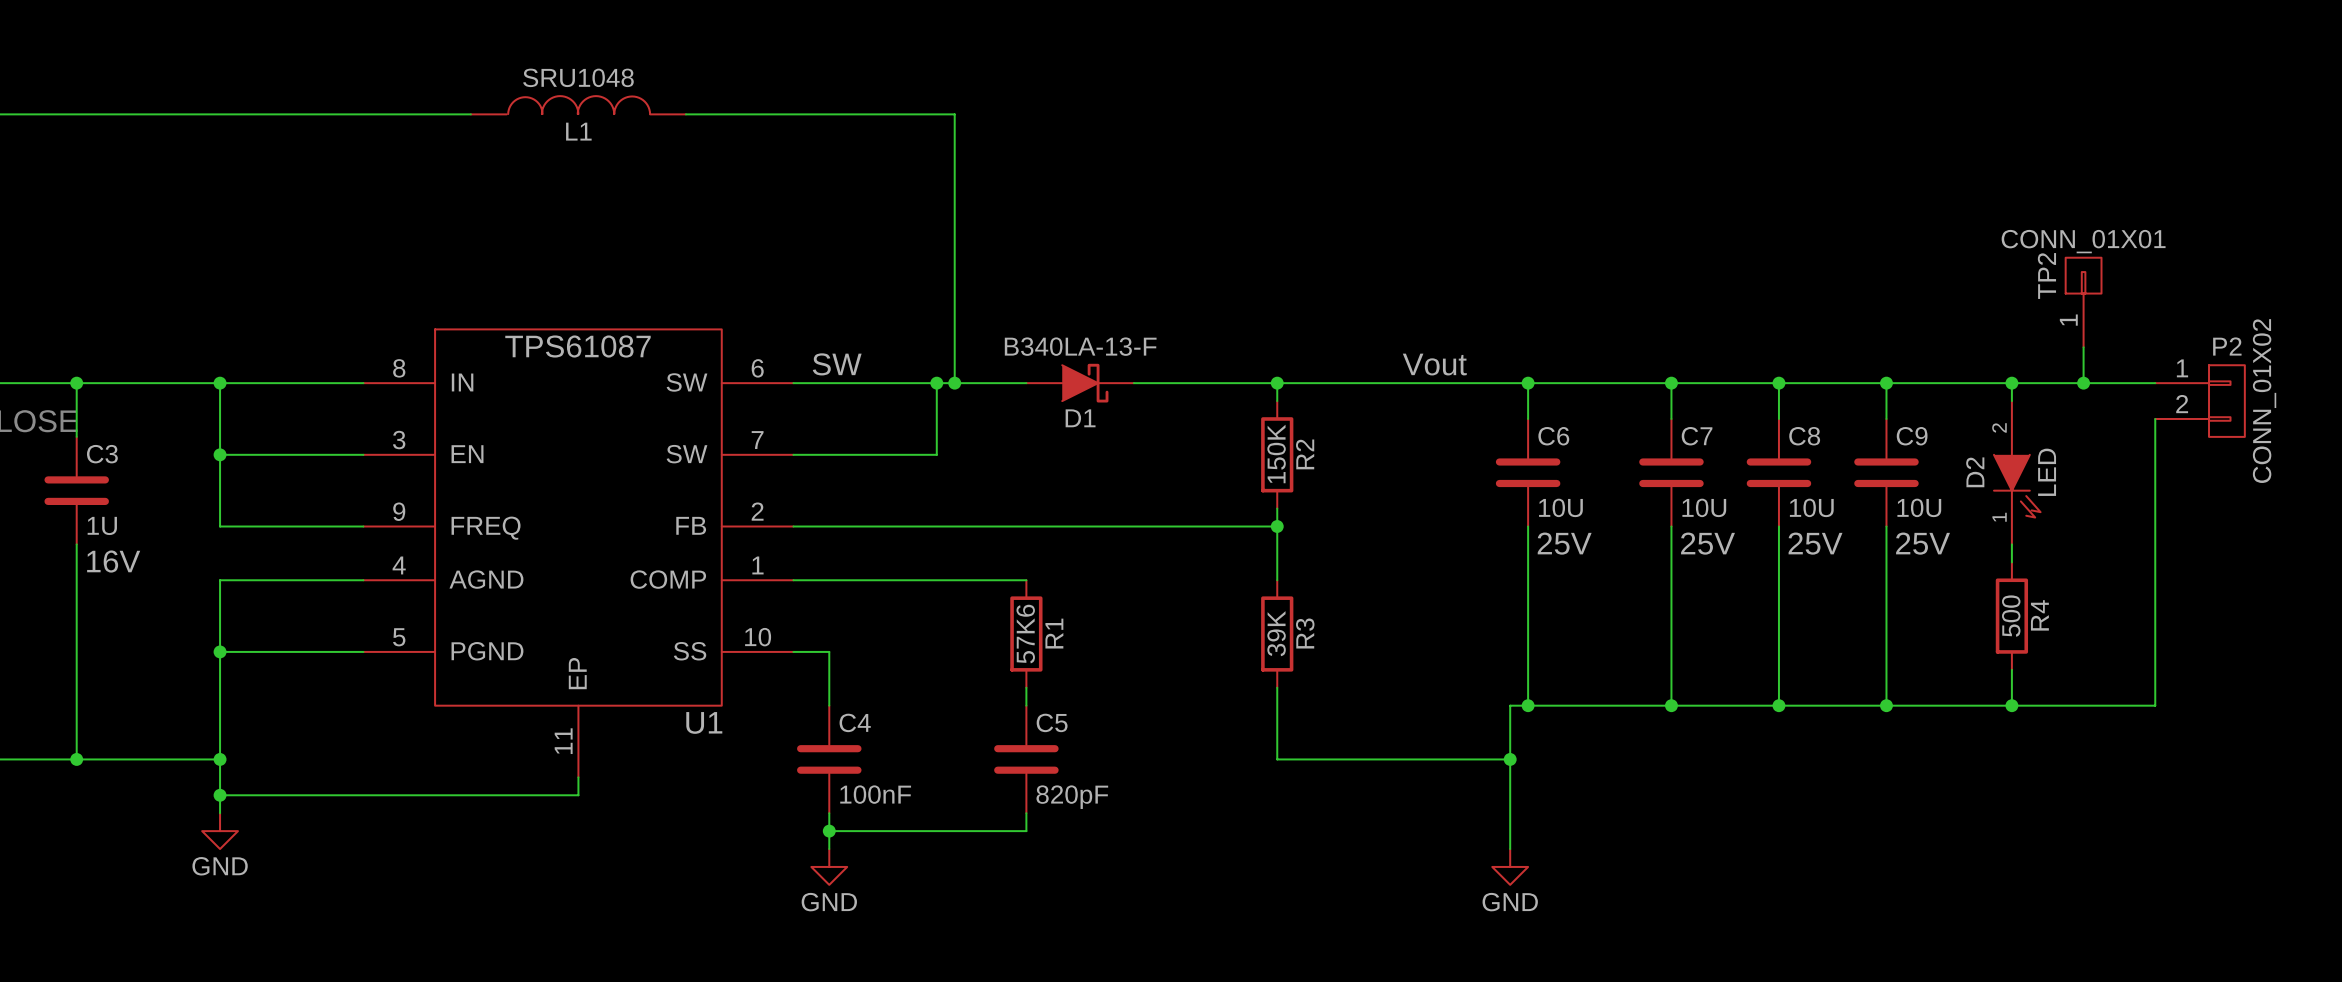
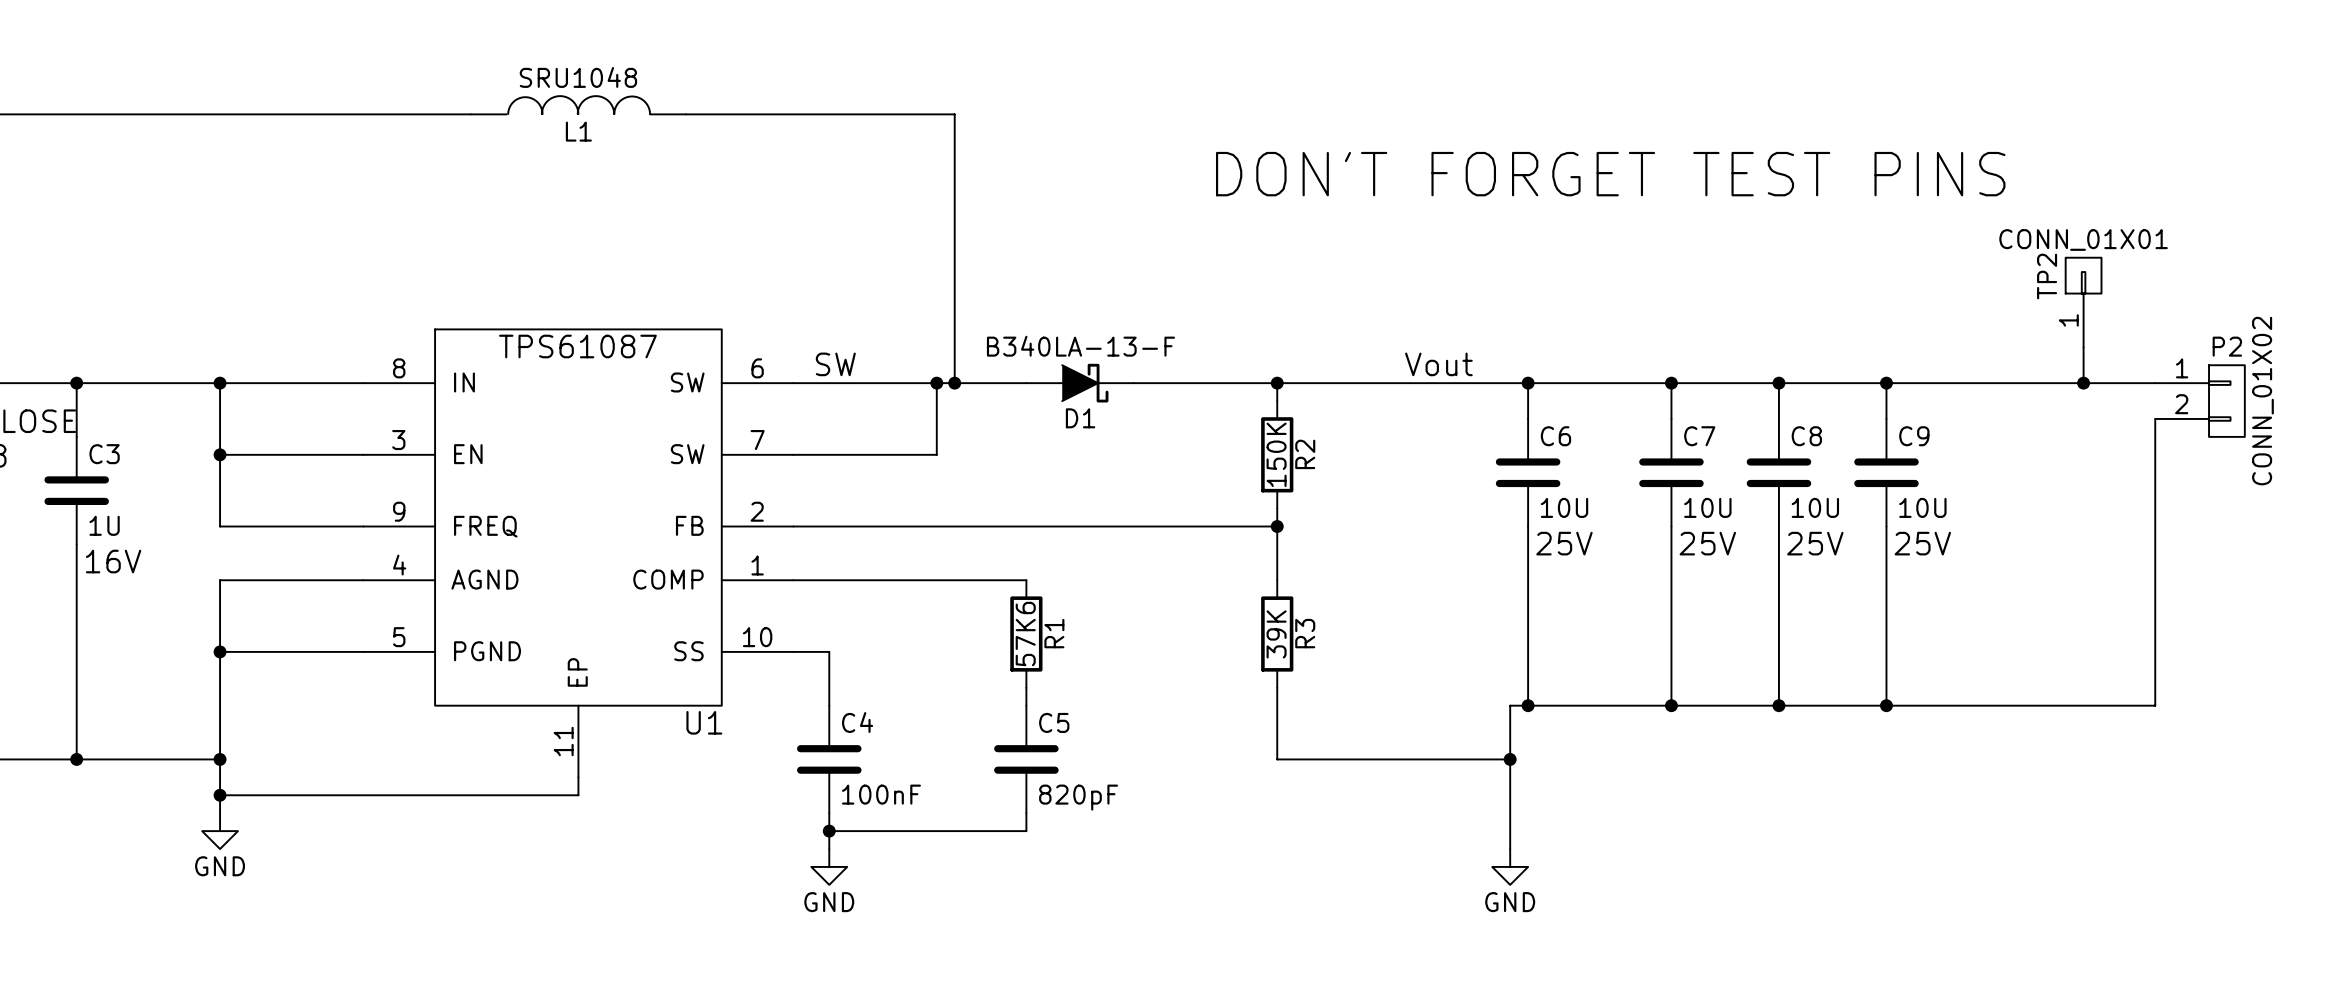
text: none -> DON'T FORGET TEST PINS (1610, 174)
wire: (2011, 383) (2011, 401) -> none
junction: (2011, 383) -> none
D2: LED (2017, 472) -> none
wire: (2011, 544) (2011, 562) -> none
R4: 500 (2011, 616) -> none
wire: (2011, 669) (2011, 705) -> none
junction: (2011, 705) -> none

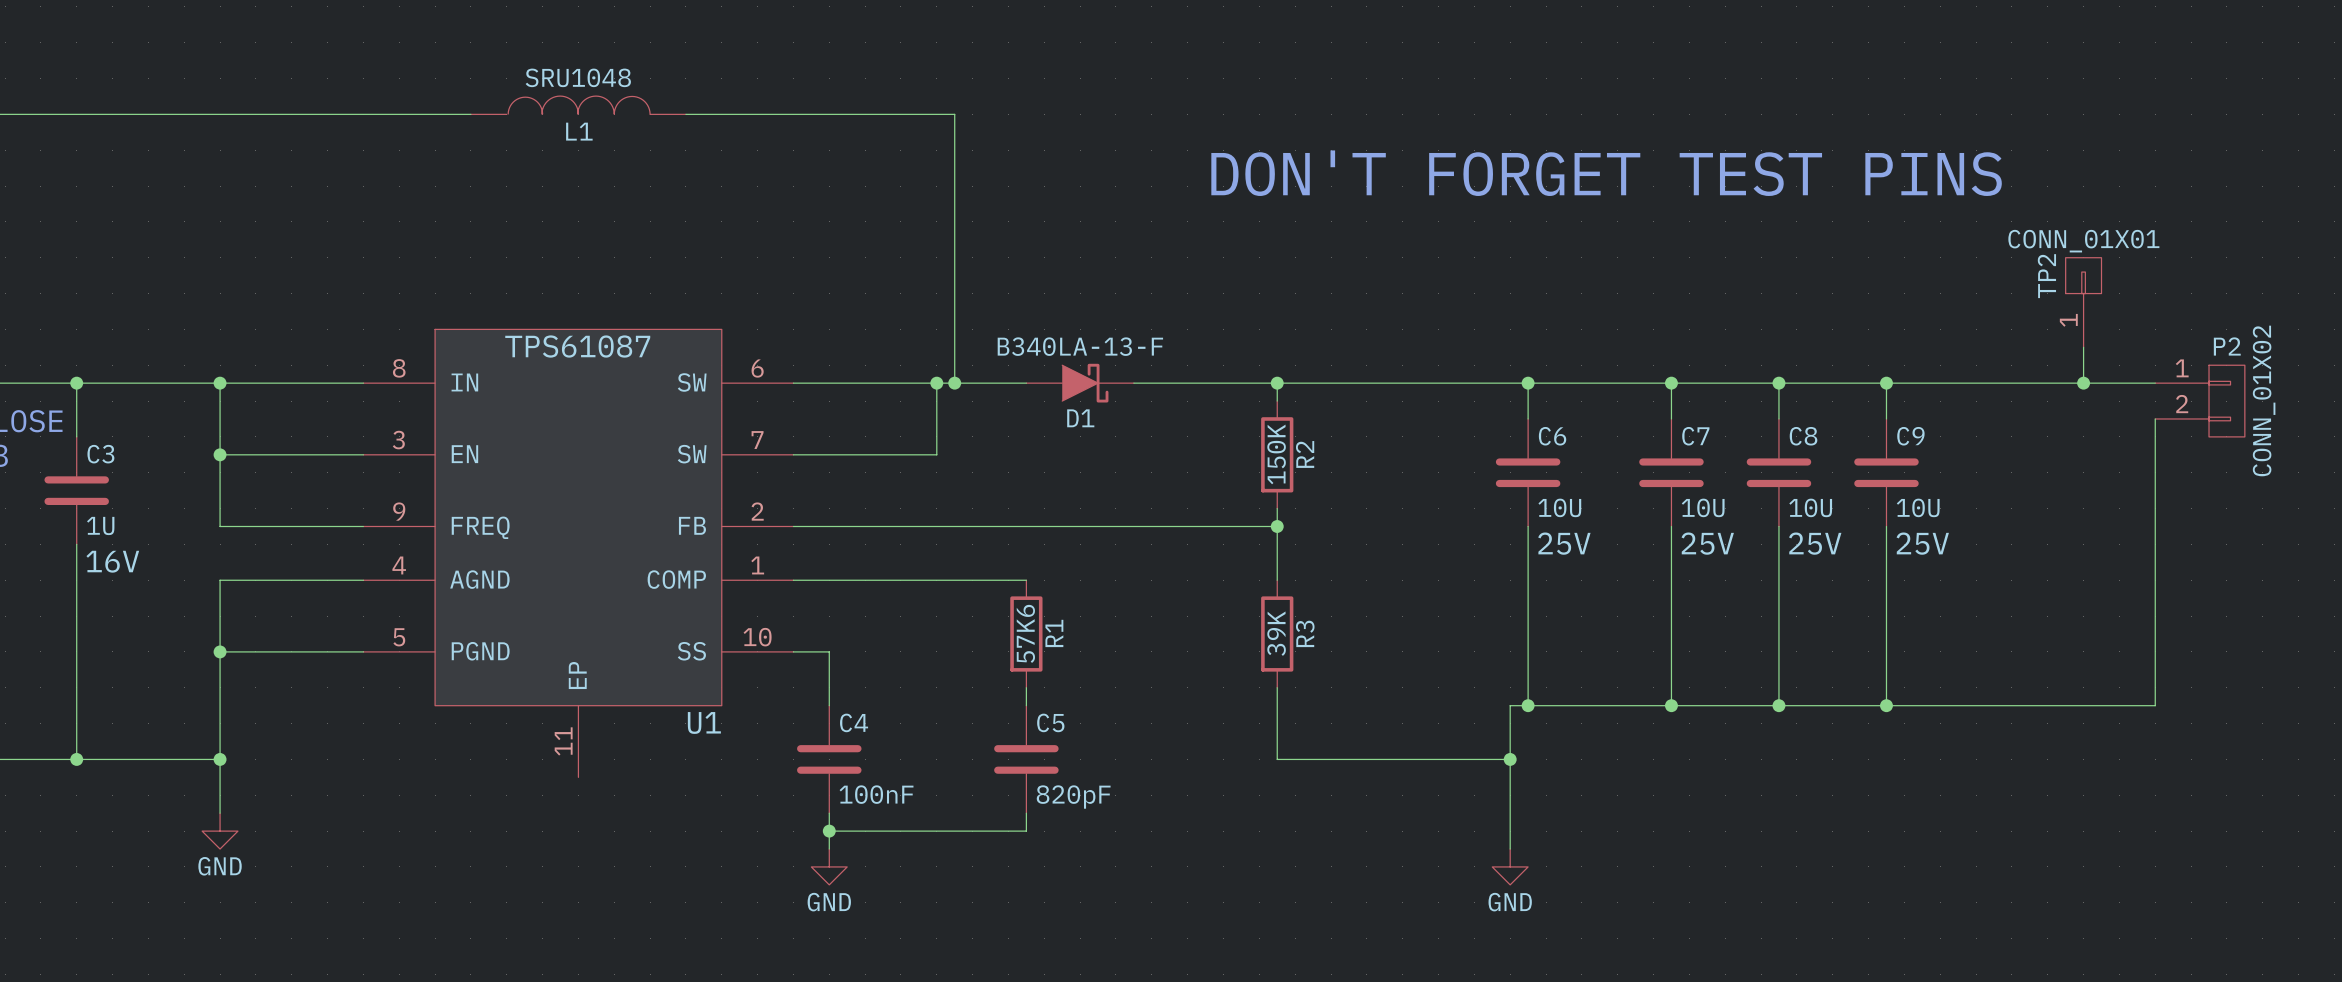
label: SW (835, 364) -> none
label: Vout (1438, 364) -> none
wire: (578, 777) (578, 795) (220, 795) -> none
junction: (220, 795) -> none

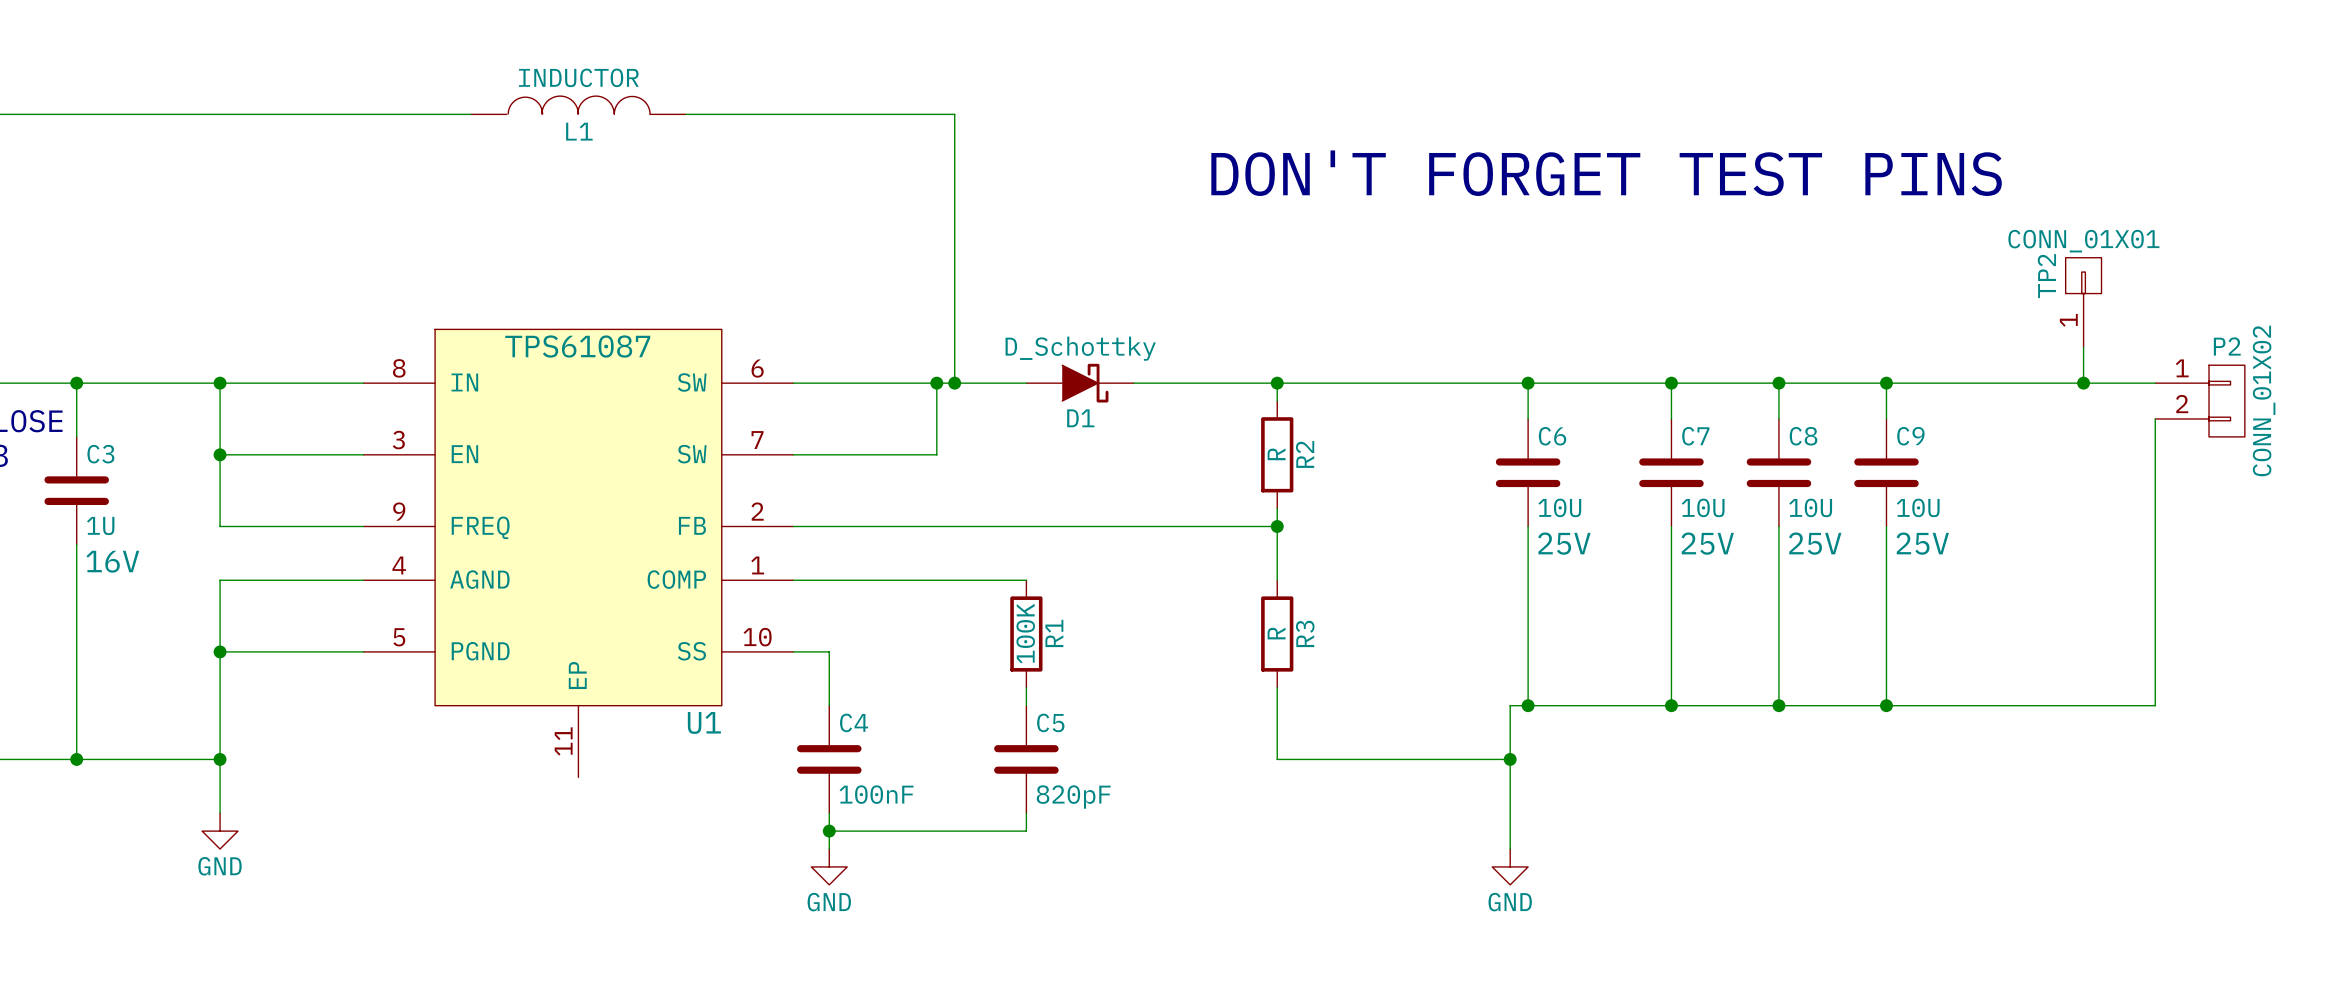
L1 value: SRU1048 (578, 77) -> INDUCTOR (578, 77)
D1 value: B340LA-13-F (1080, 346) -> D_Schottky (1080, 348)
R2 value: 150K (1276, 454) -> R (1276, 454)
R1 value: 57K6 (1025, 633) -> 100K (1025, 633)
R3 value: 39K (1276, 633) -> R (1276, 633)

